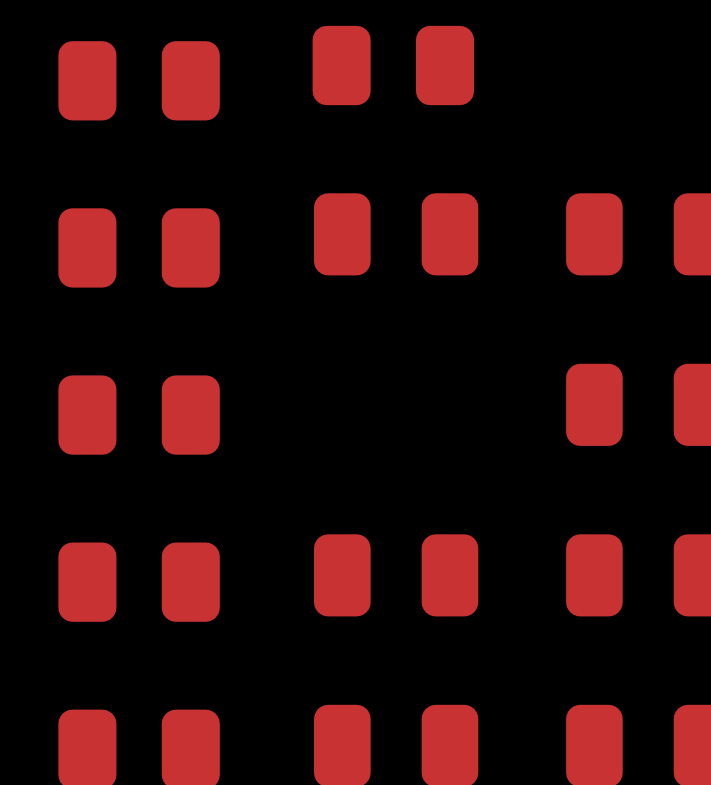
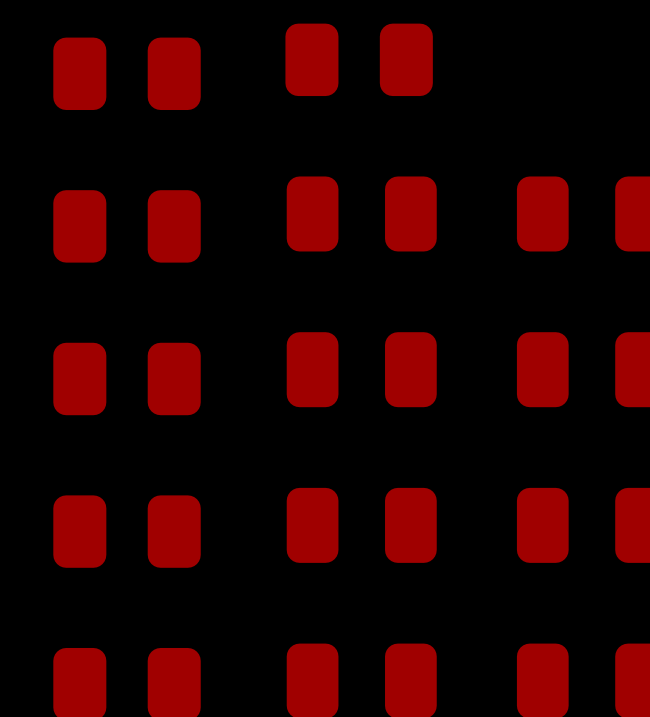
part: none -> (361, 369)

